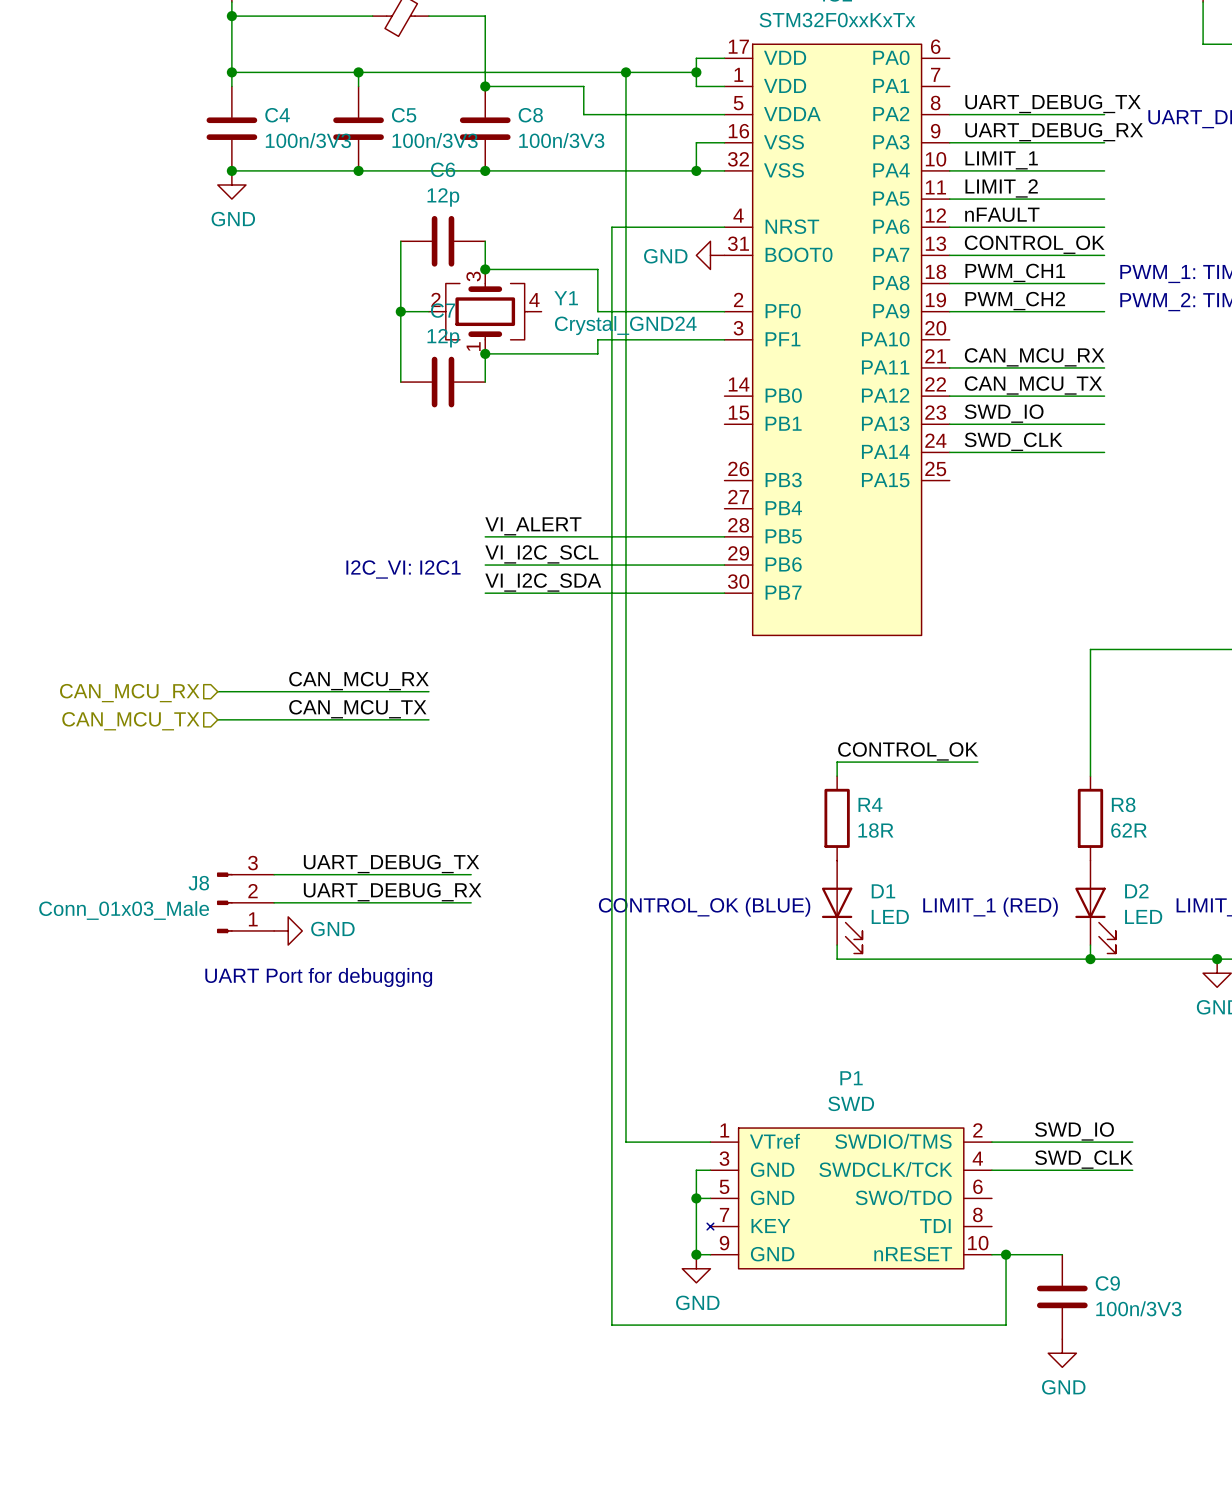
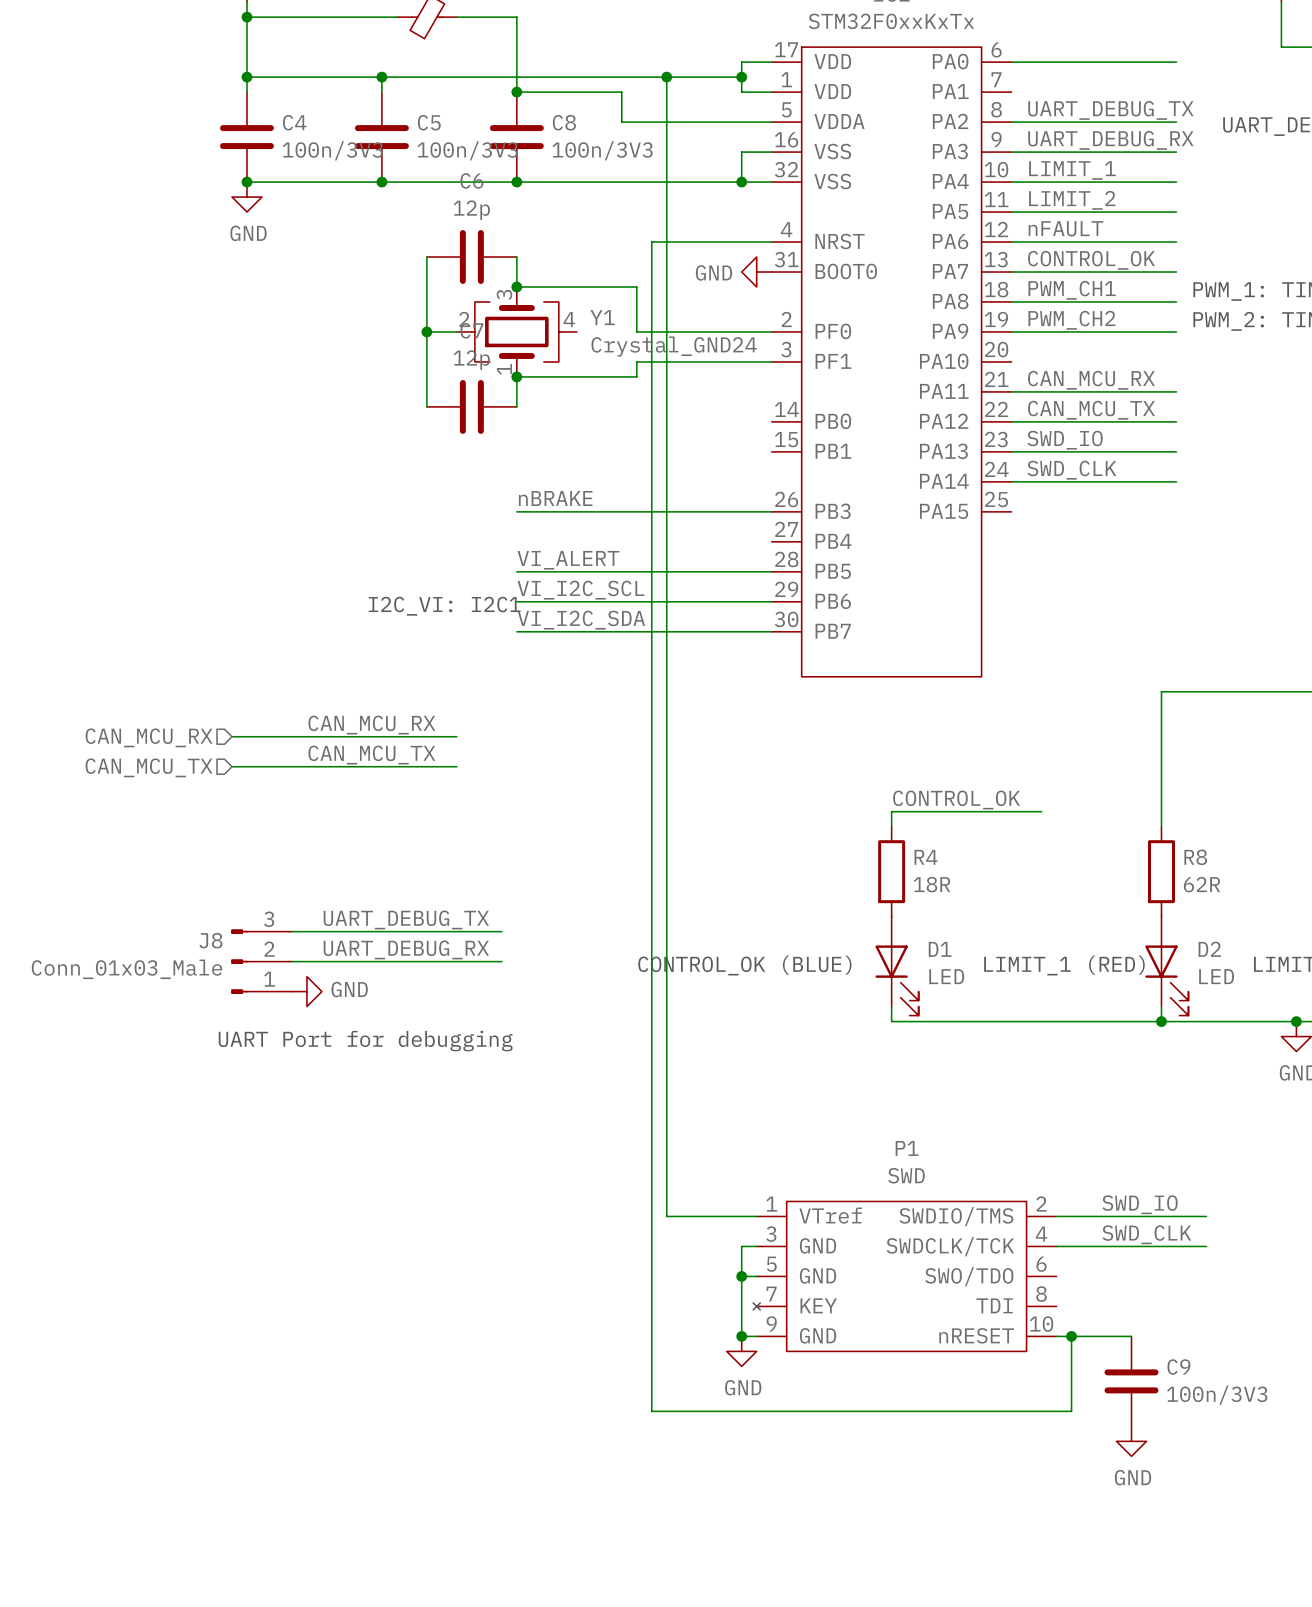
wire: none -> (1011, 62) (1176, 62)
label: none -> nBRAKE (555, 498)
wire: none -> (516, 511) (771, 511)

